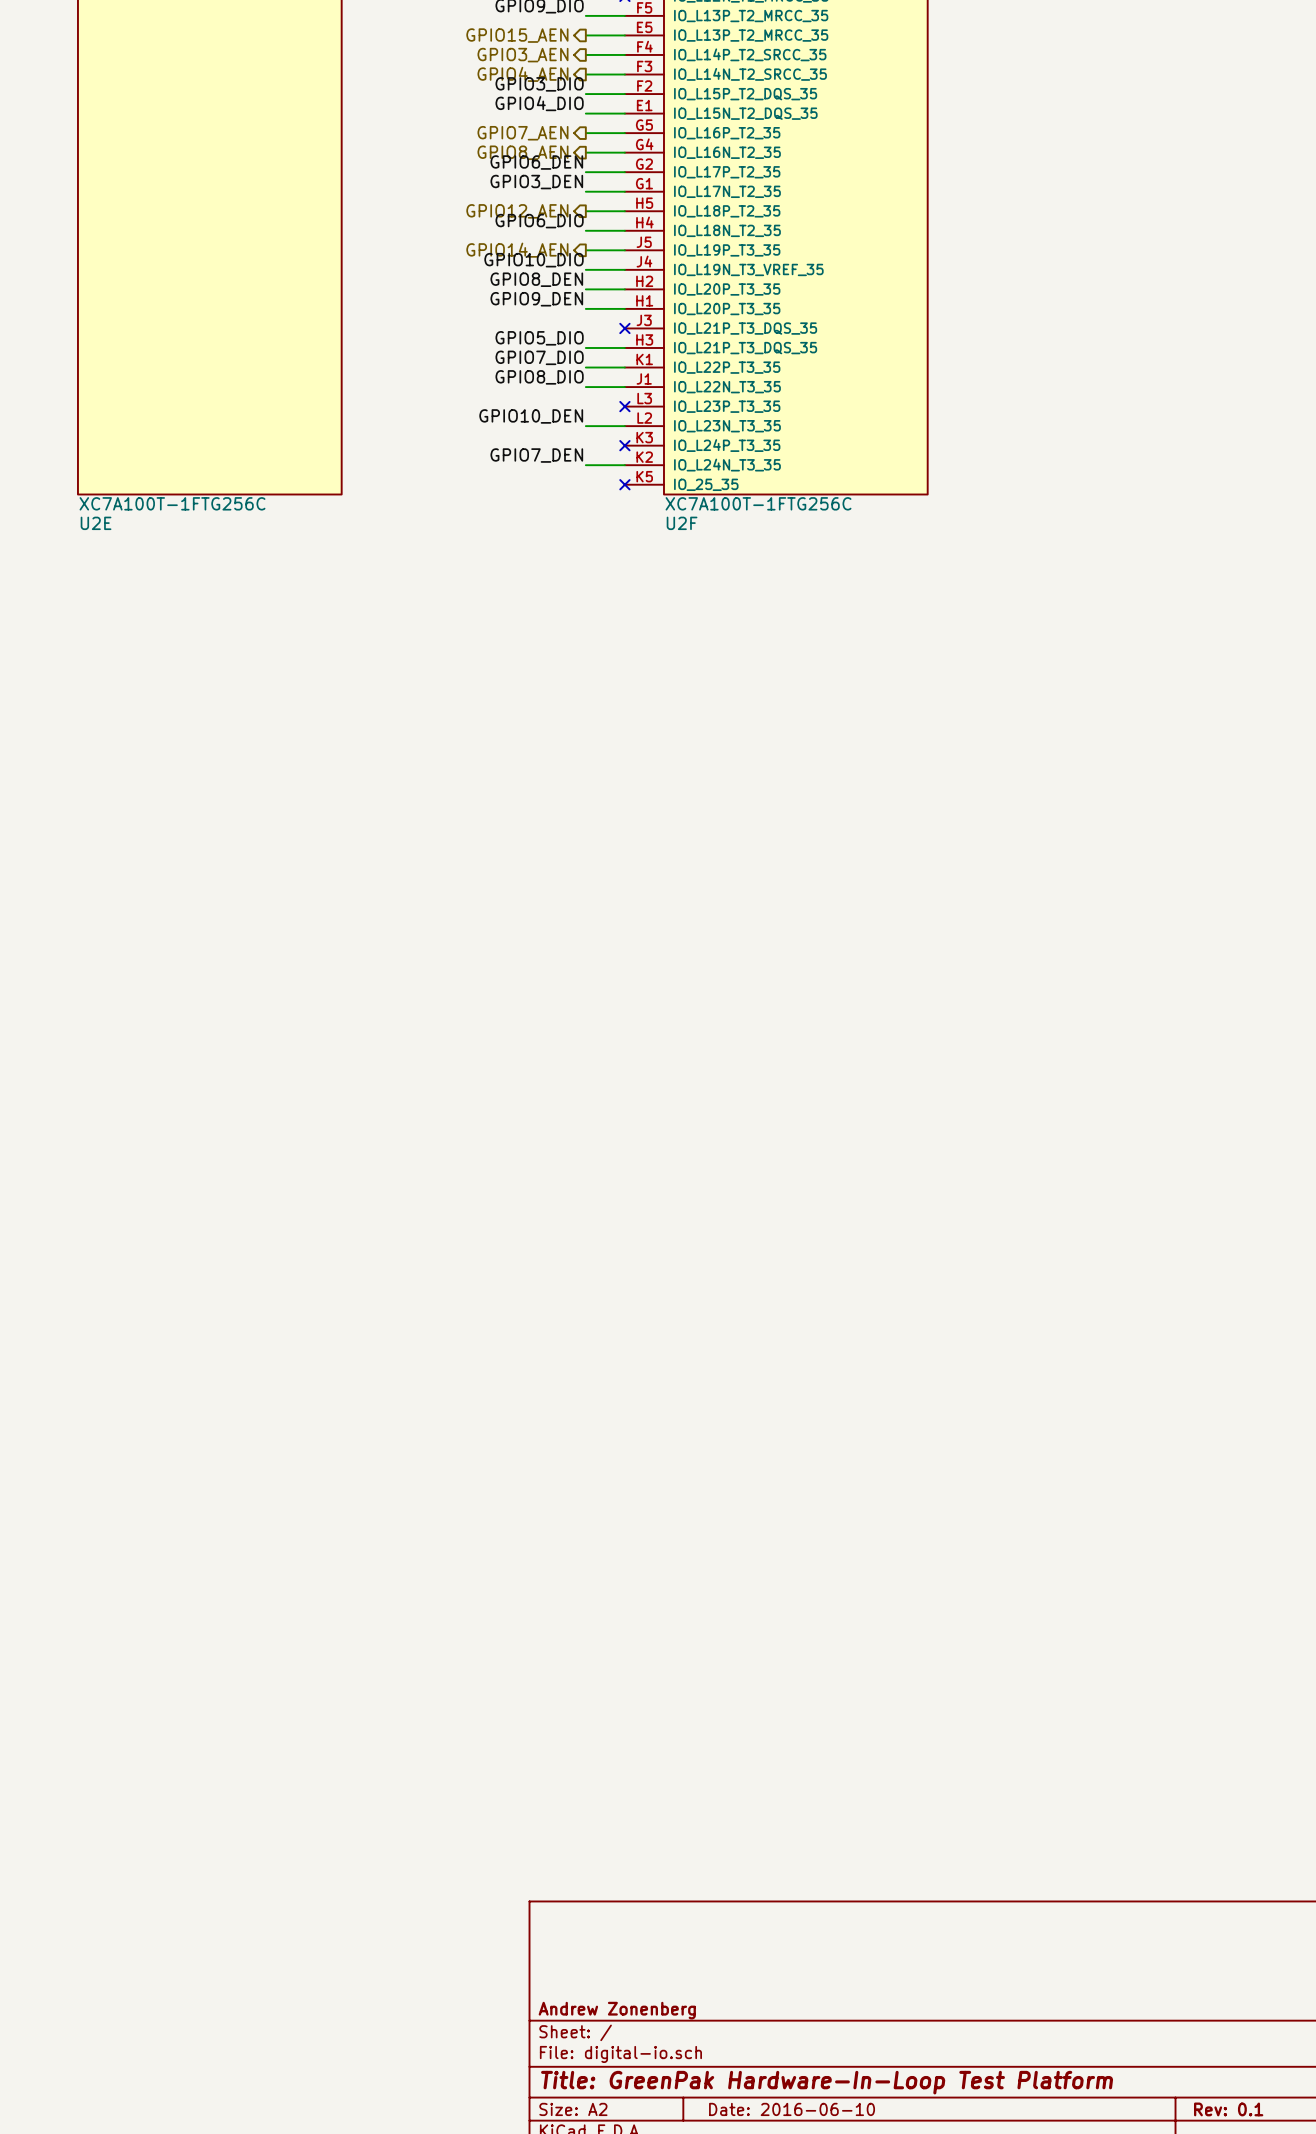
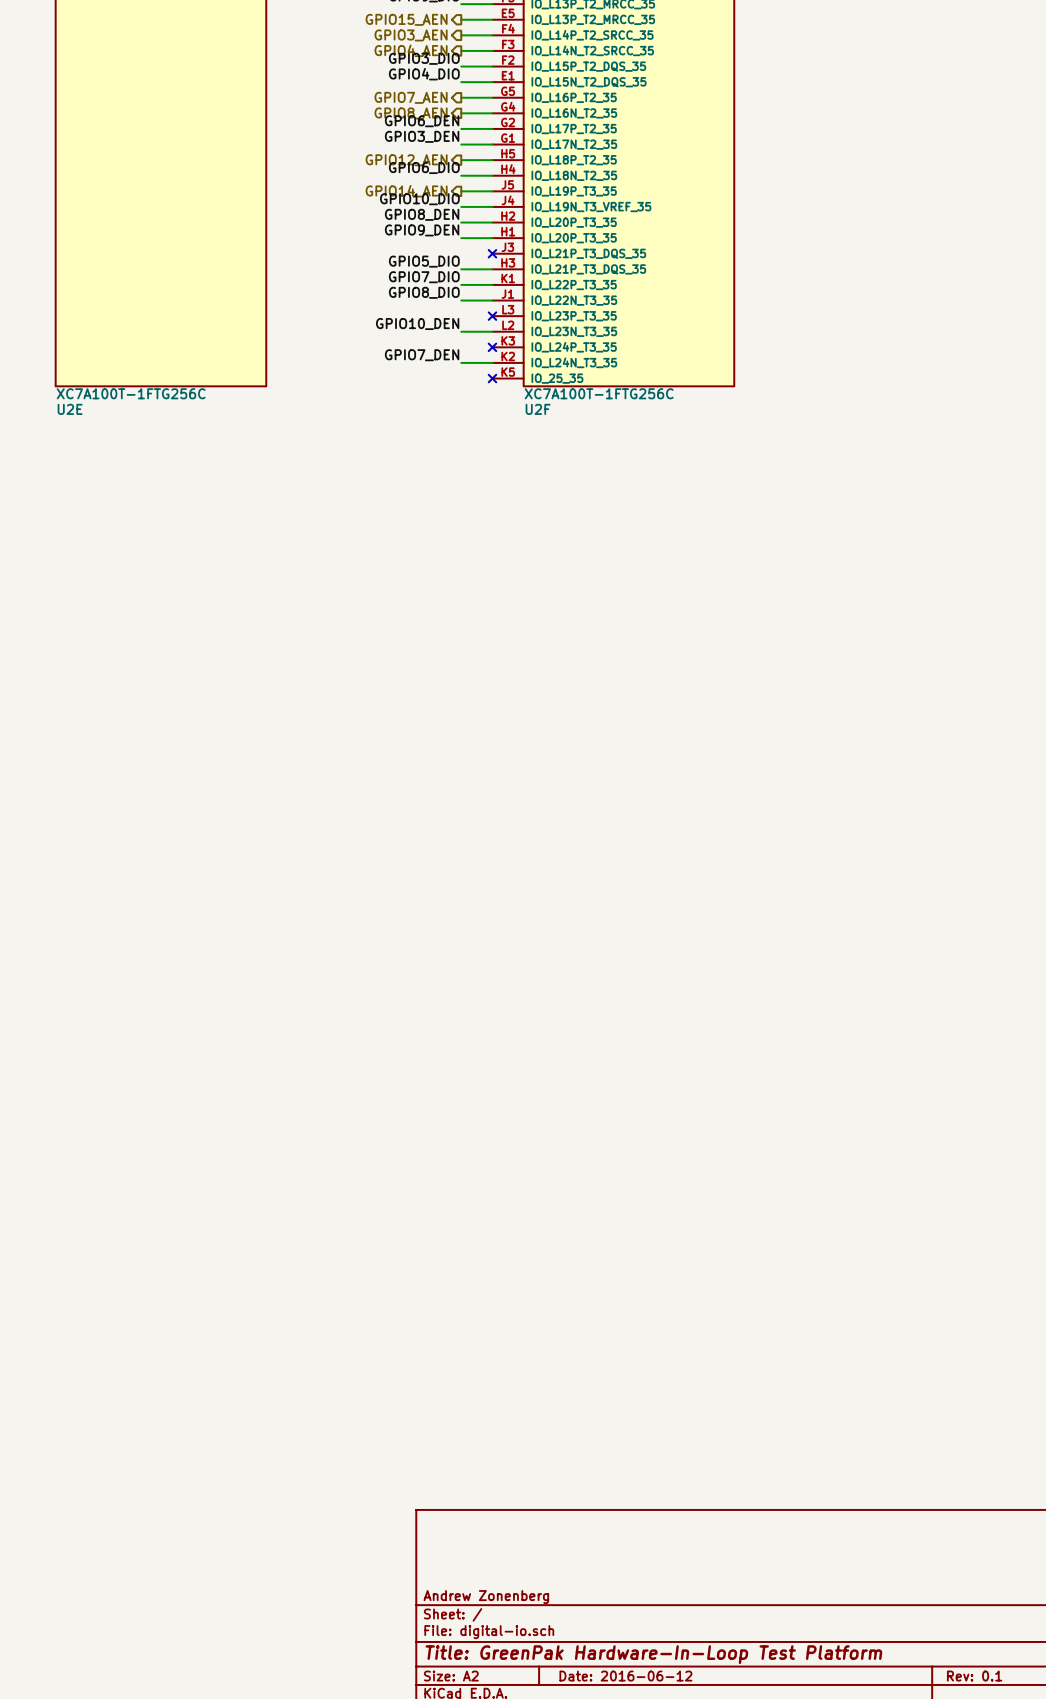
title block: Date: 2016-06-10 (792, 2109) -> Date: 2016-06-12 (625, 1676)

